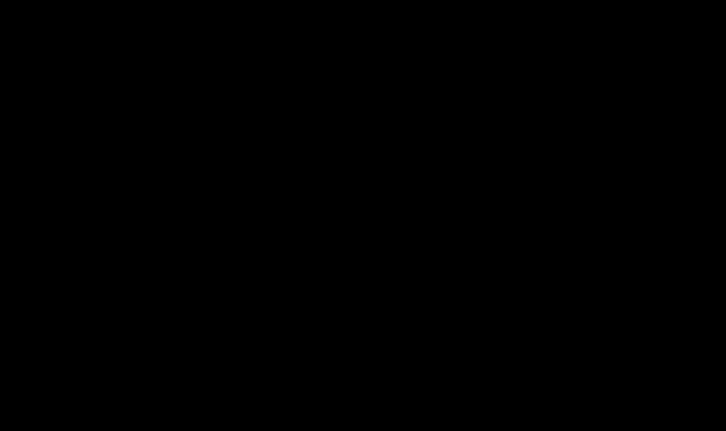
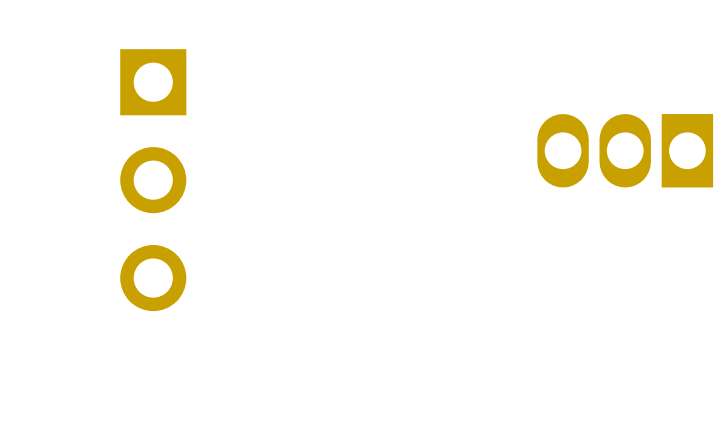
part: none -> (625, 150)
part: none -> (153, 180)

